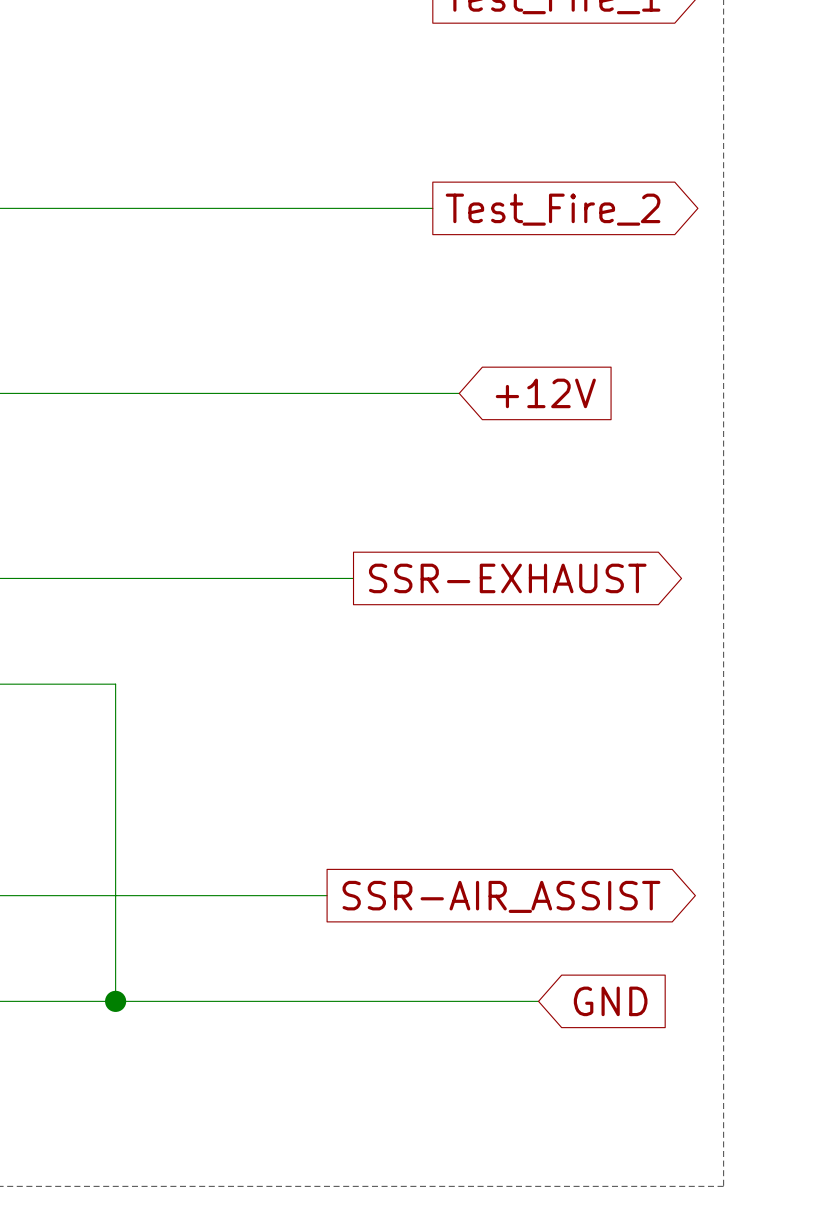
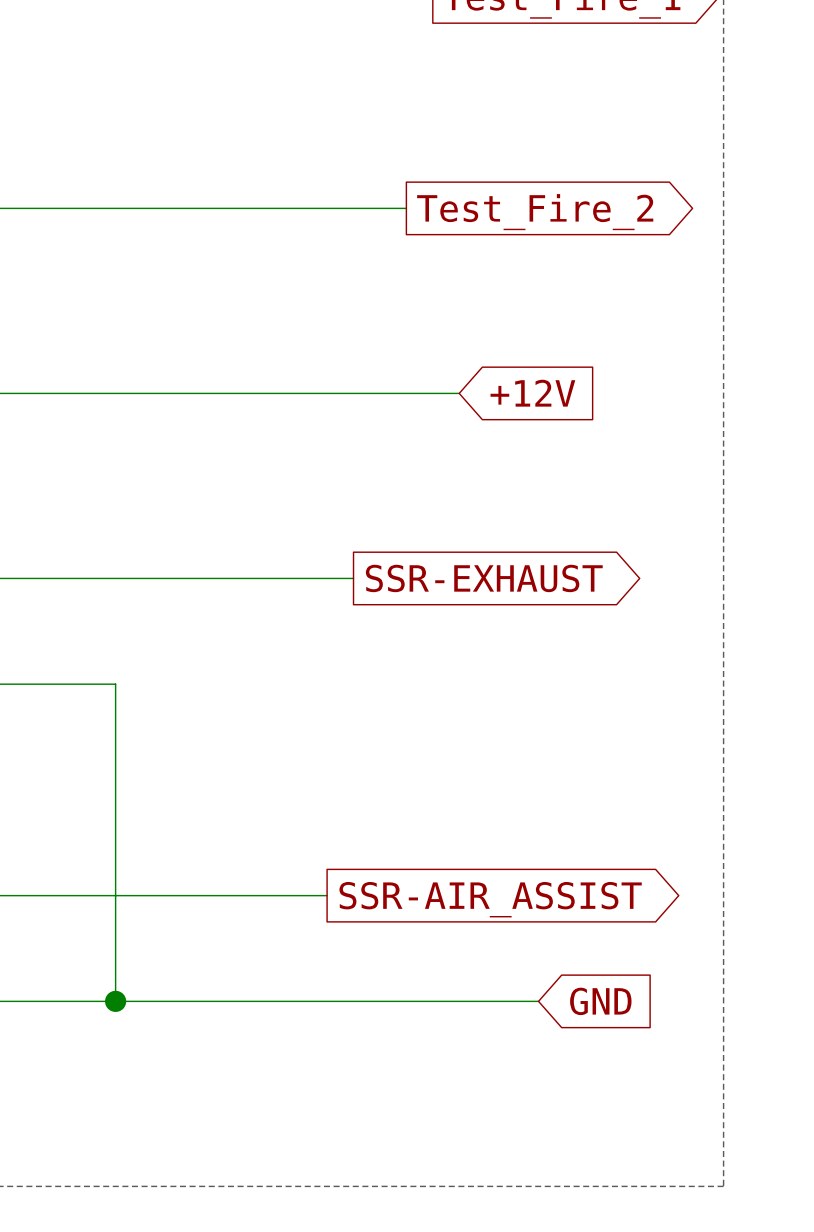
wire: (406, 208) (432, 208) -> none
global label position: Test_Fire_2 (553, 209) -> Test_Fire_2 (535, 212)

